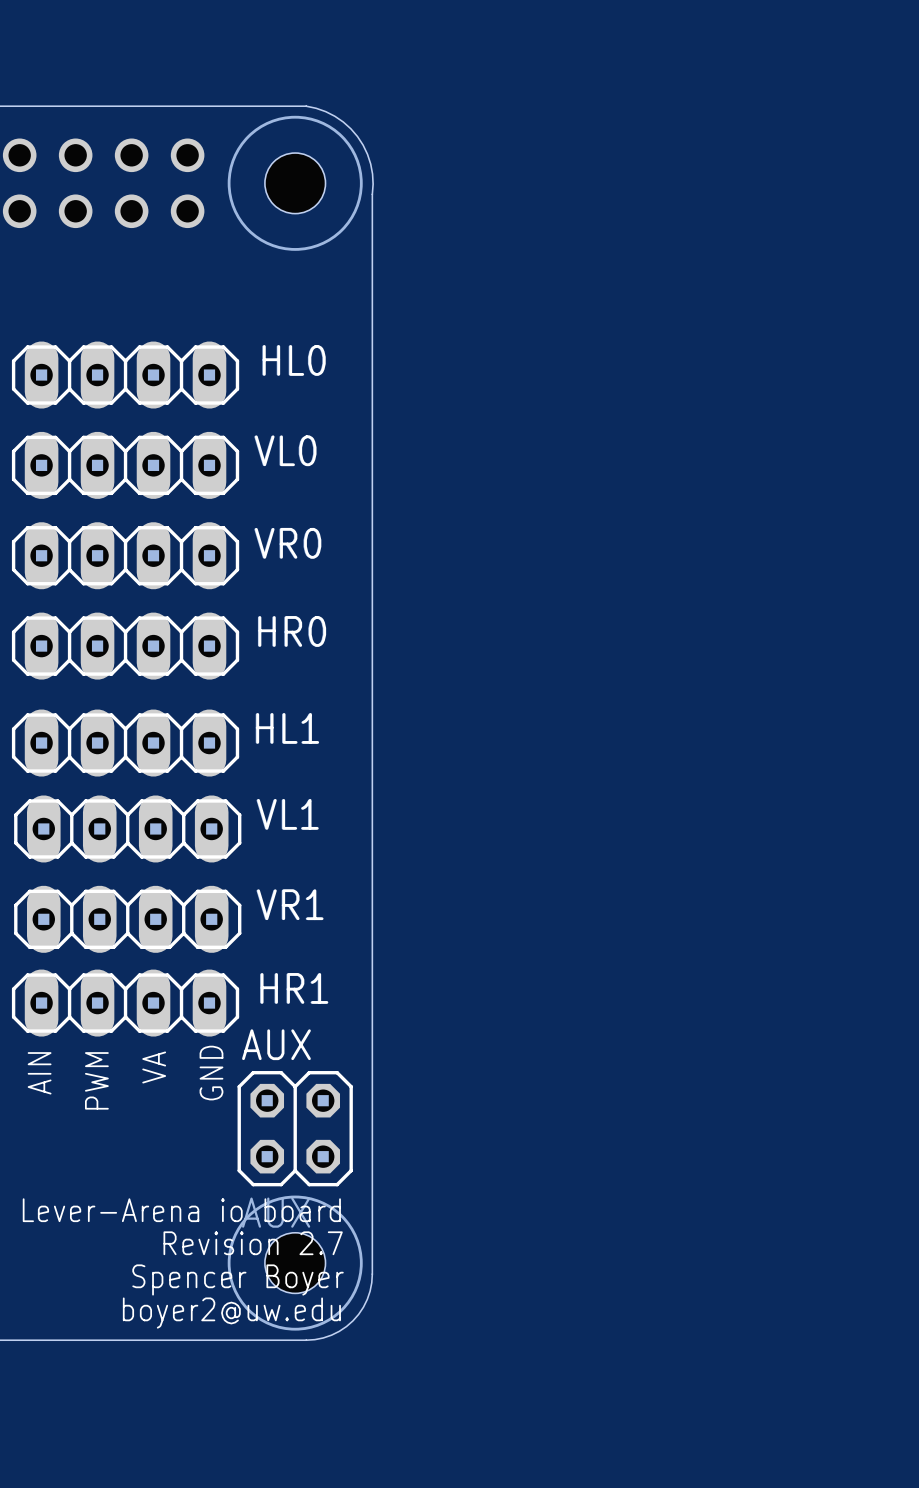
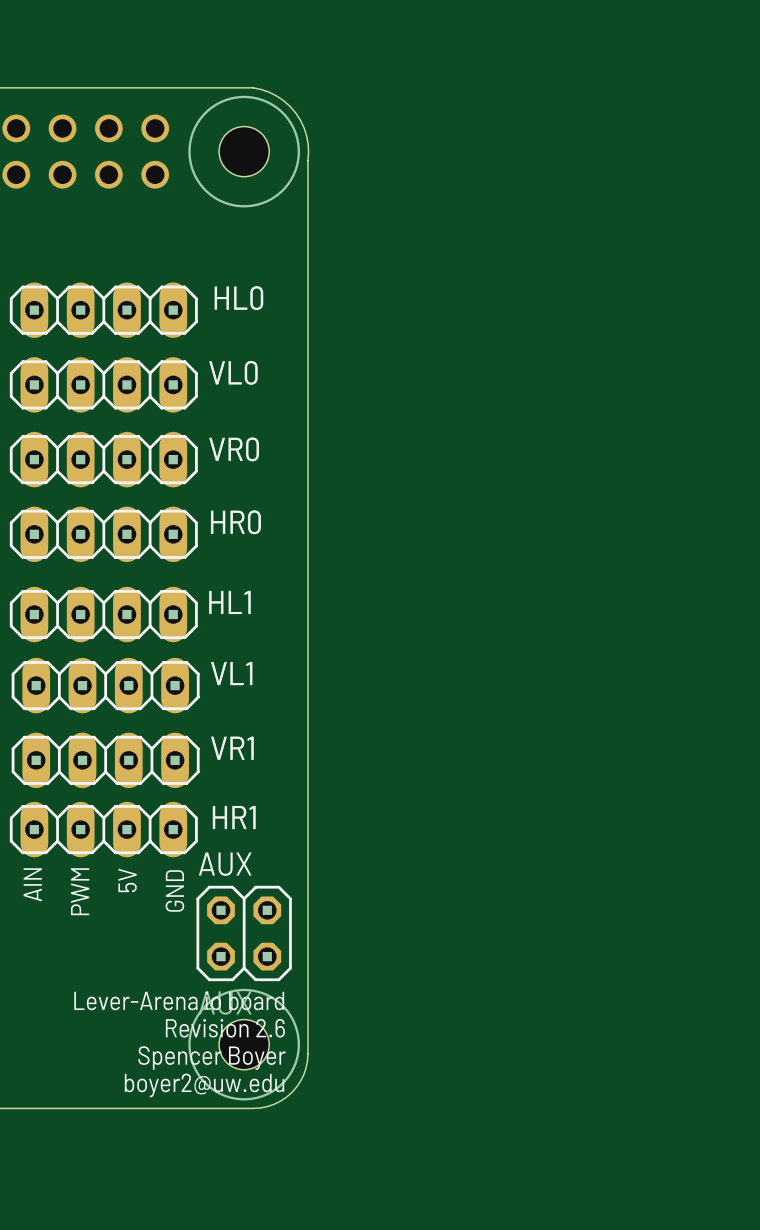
text: VA (154, 1067) -> 5V (127, 880)
text: Revision 2.7 (253, 1243) -> Revision 2.6 (225, 1028)

